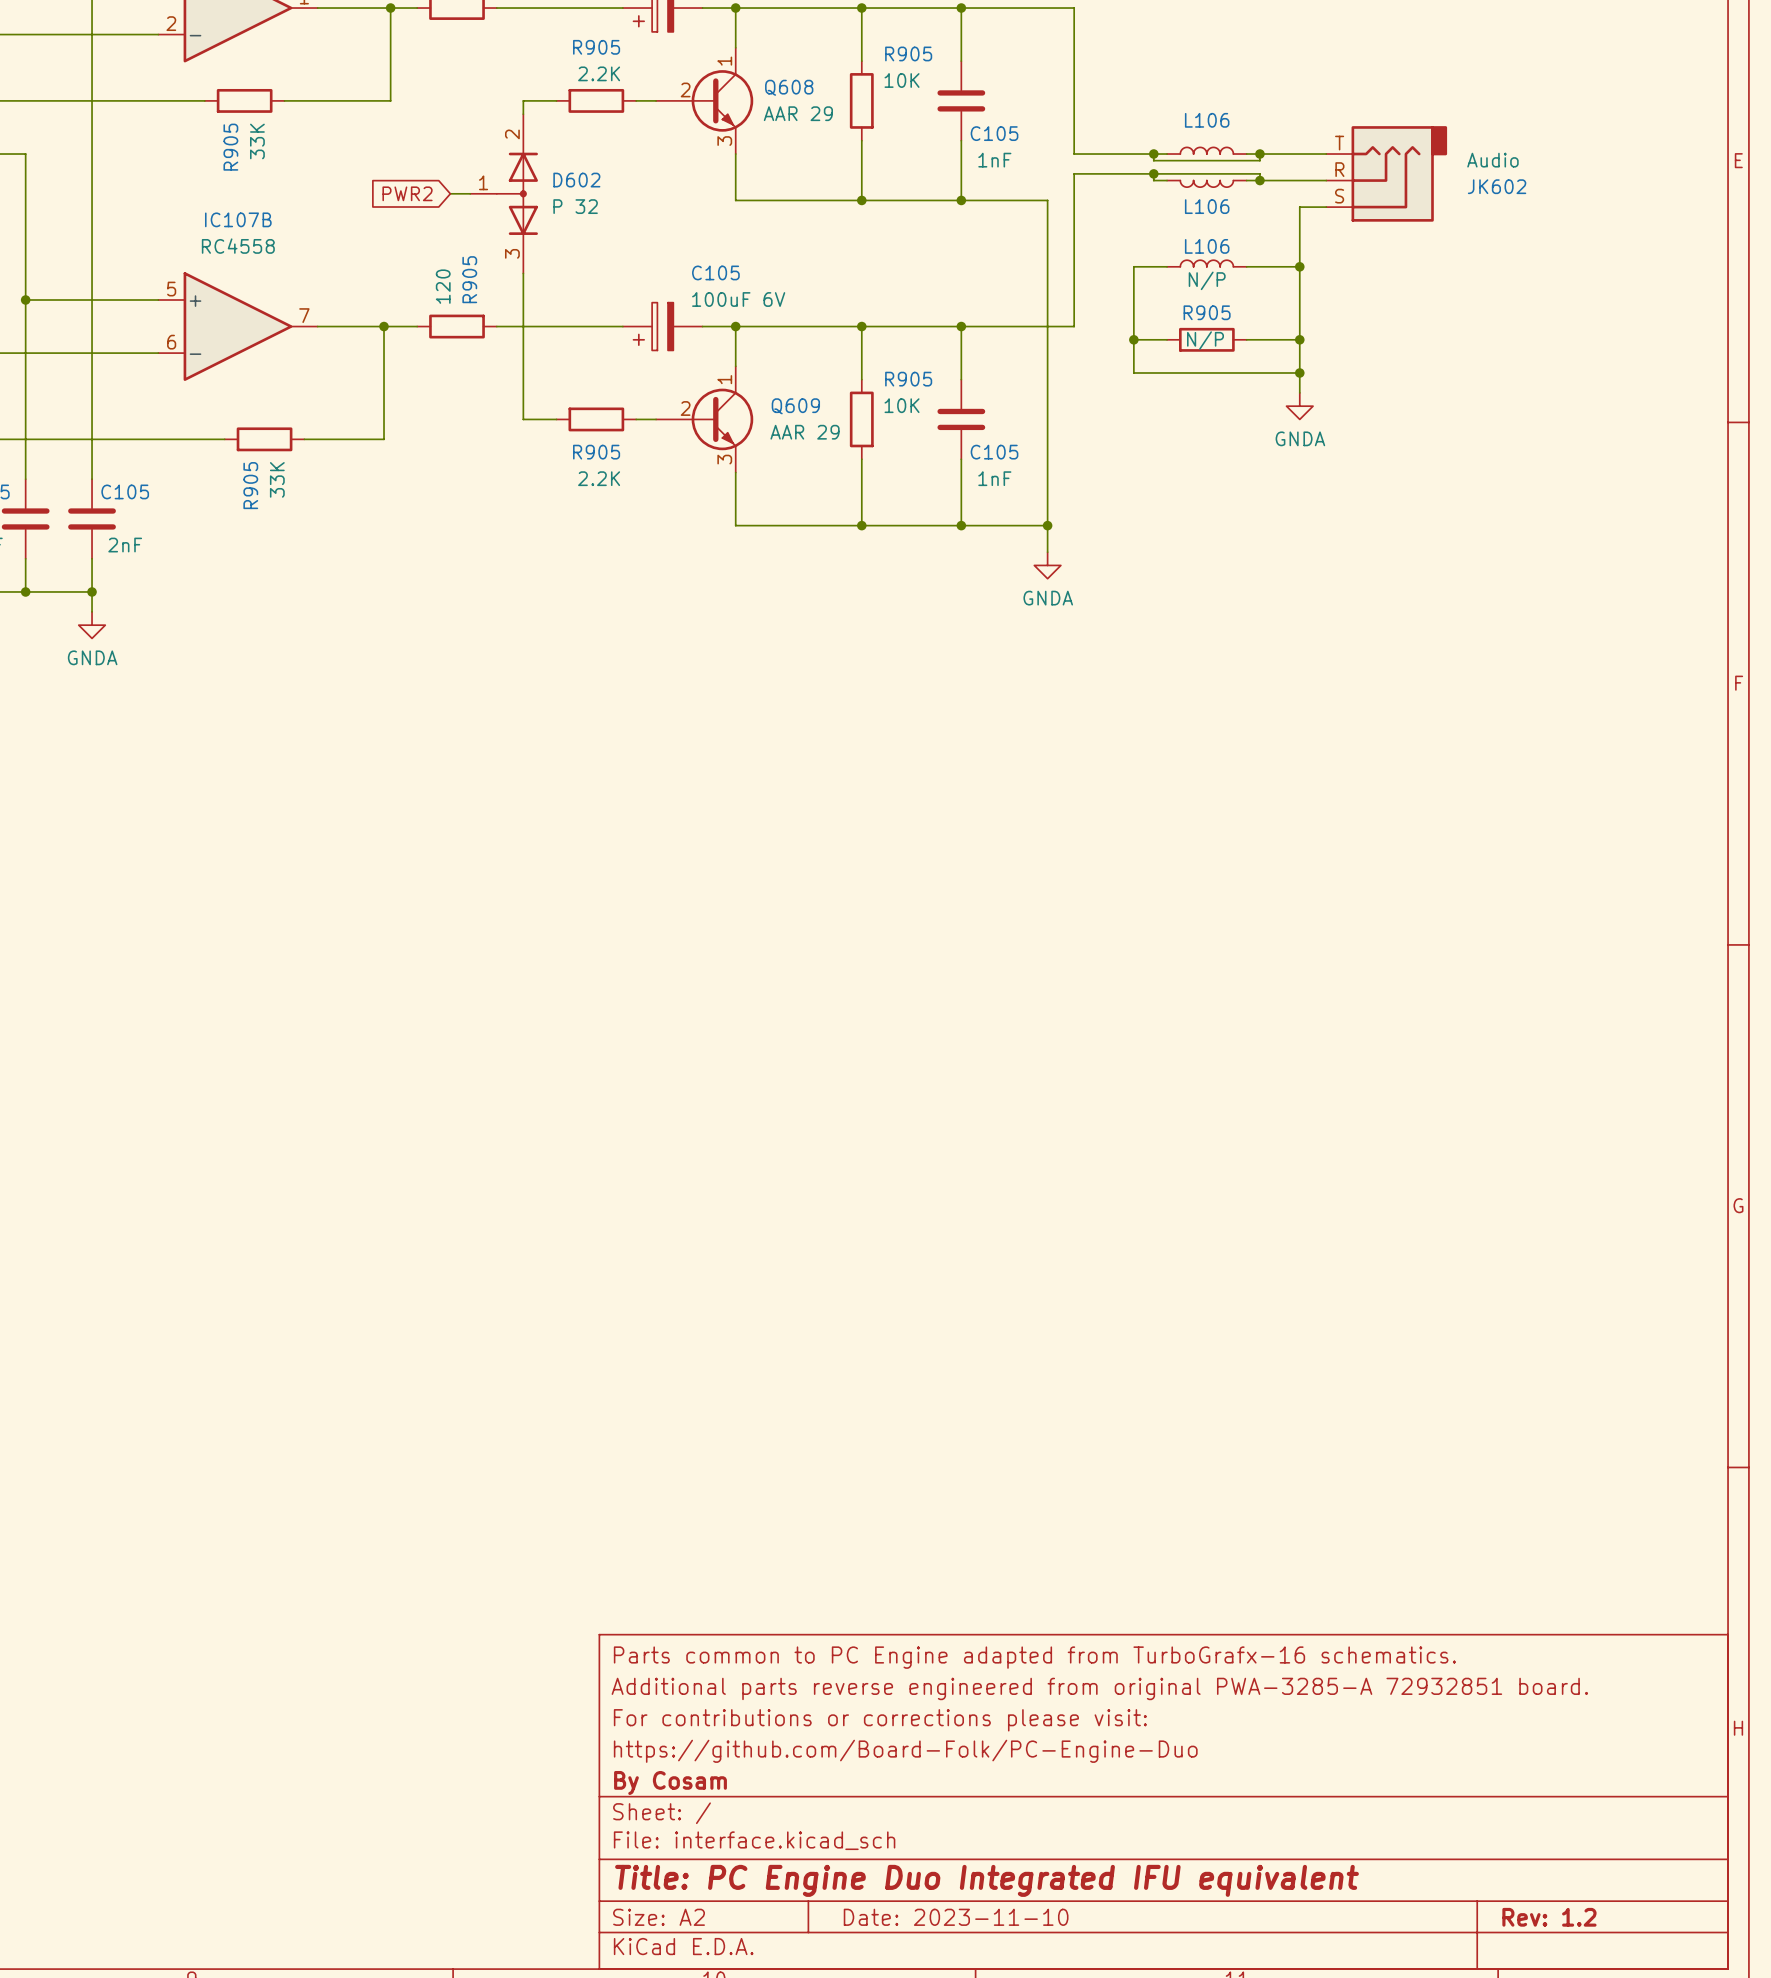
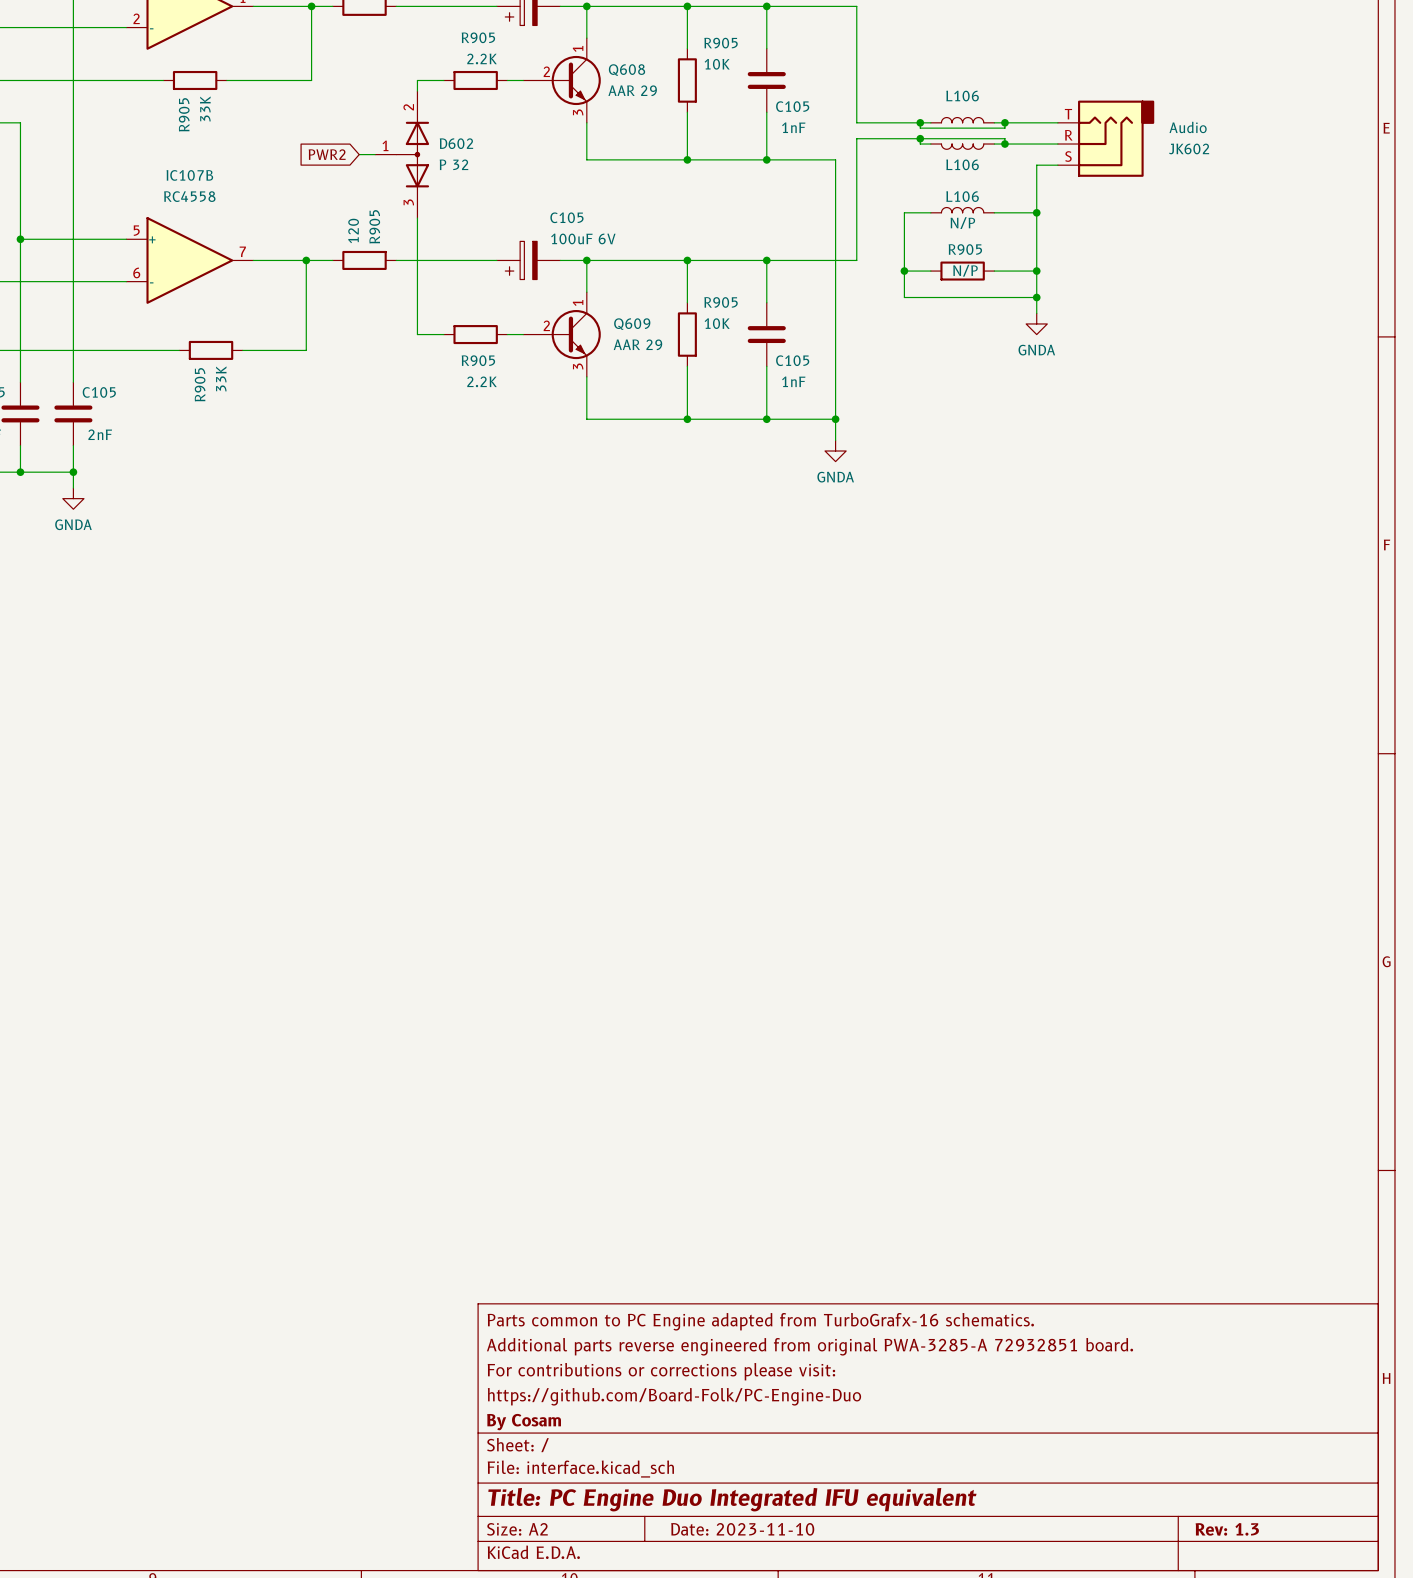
title block: Rev: 1.2 (1549, 1917) -> Rev: 1.3 (1227, 1529)

